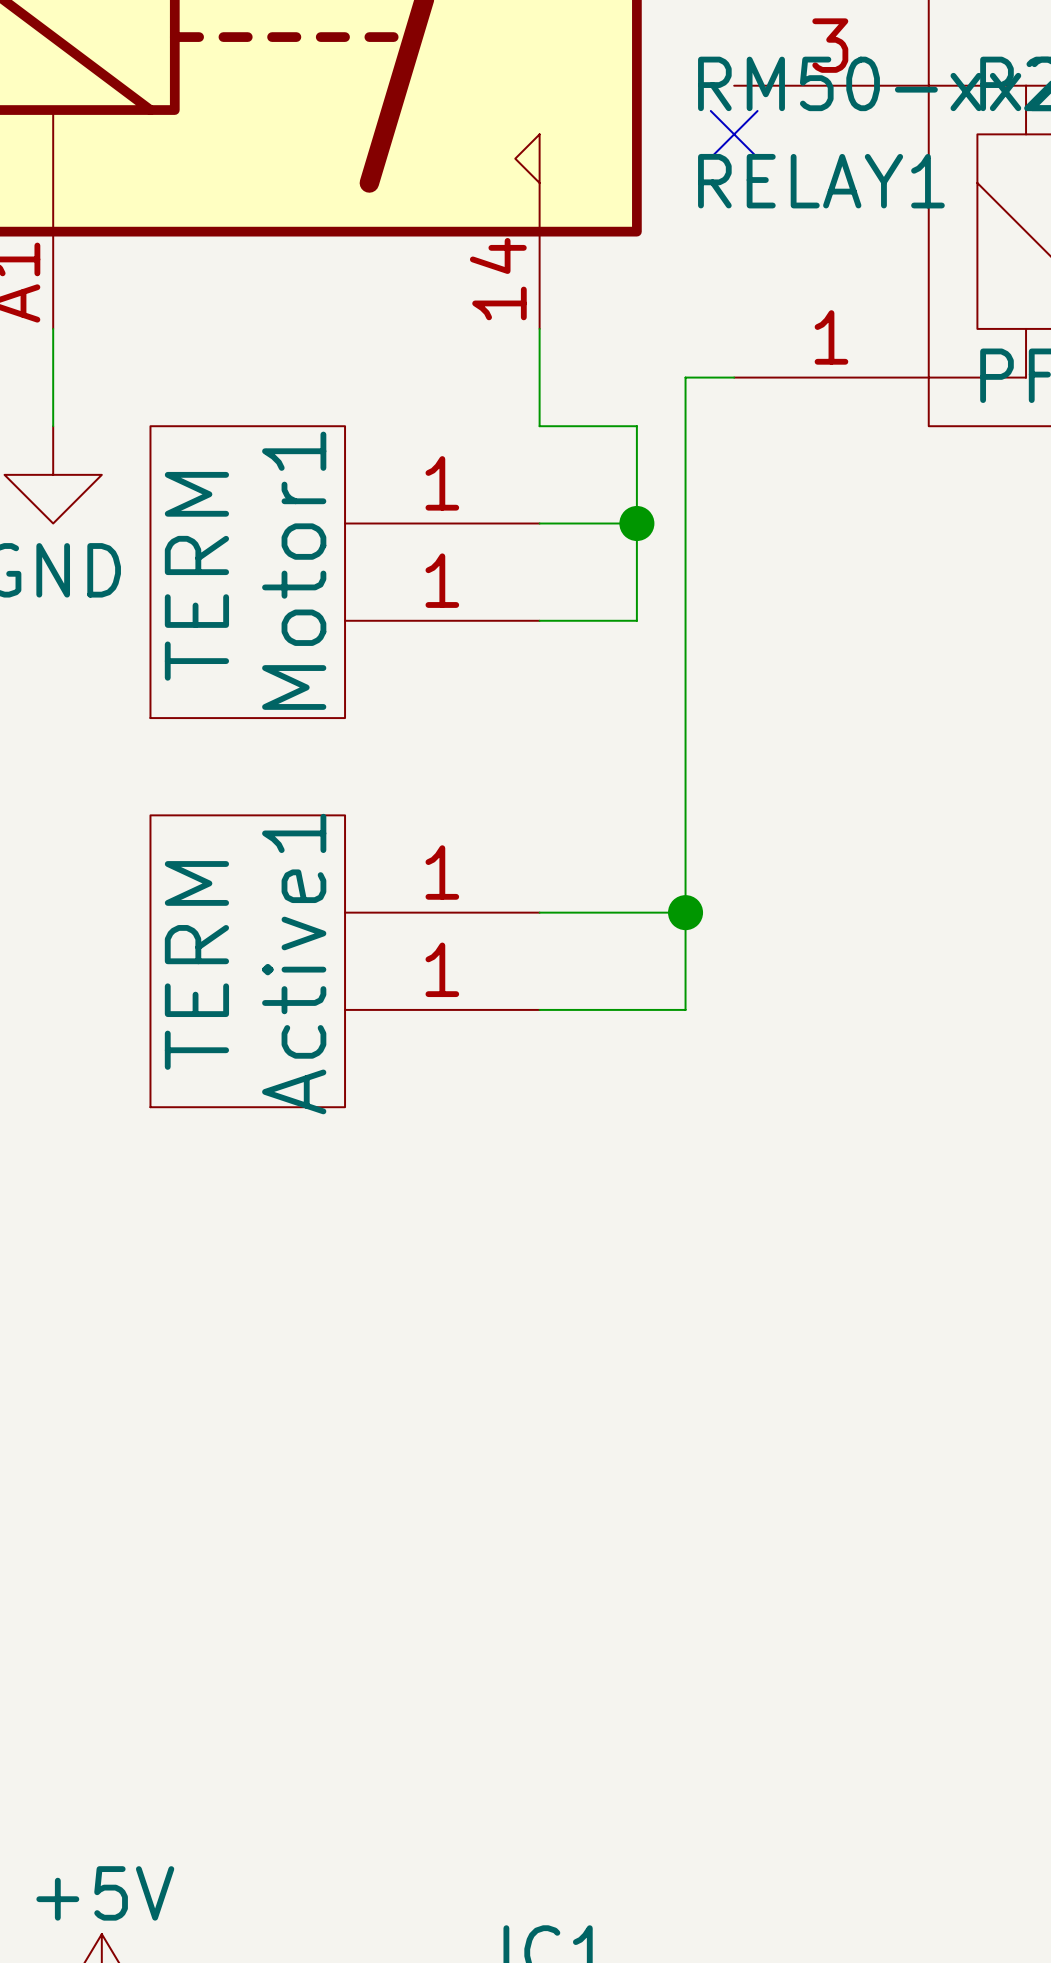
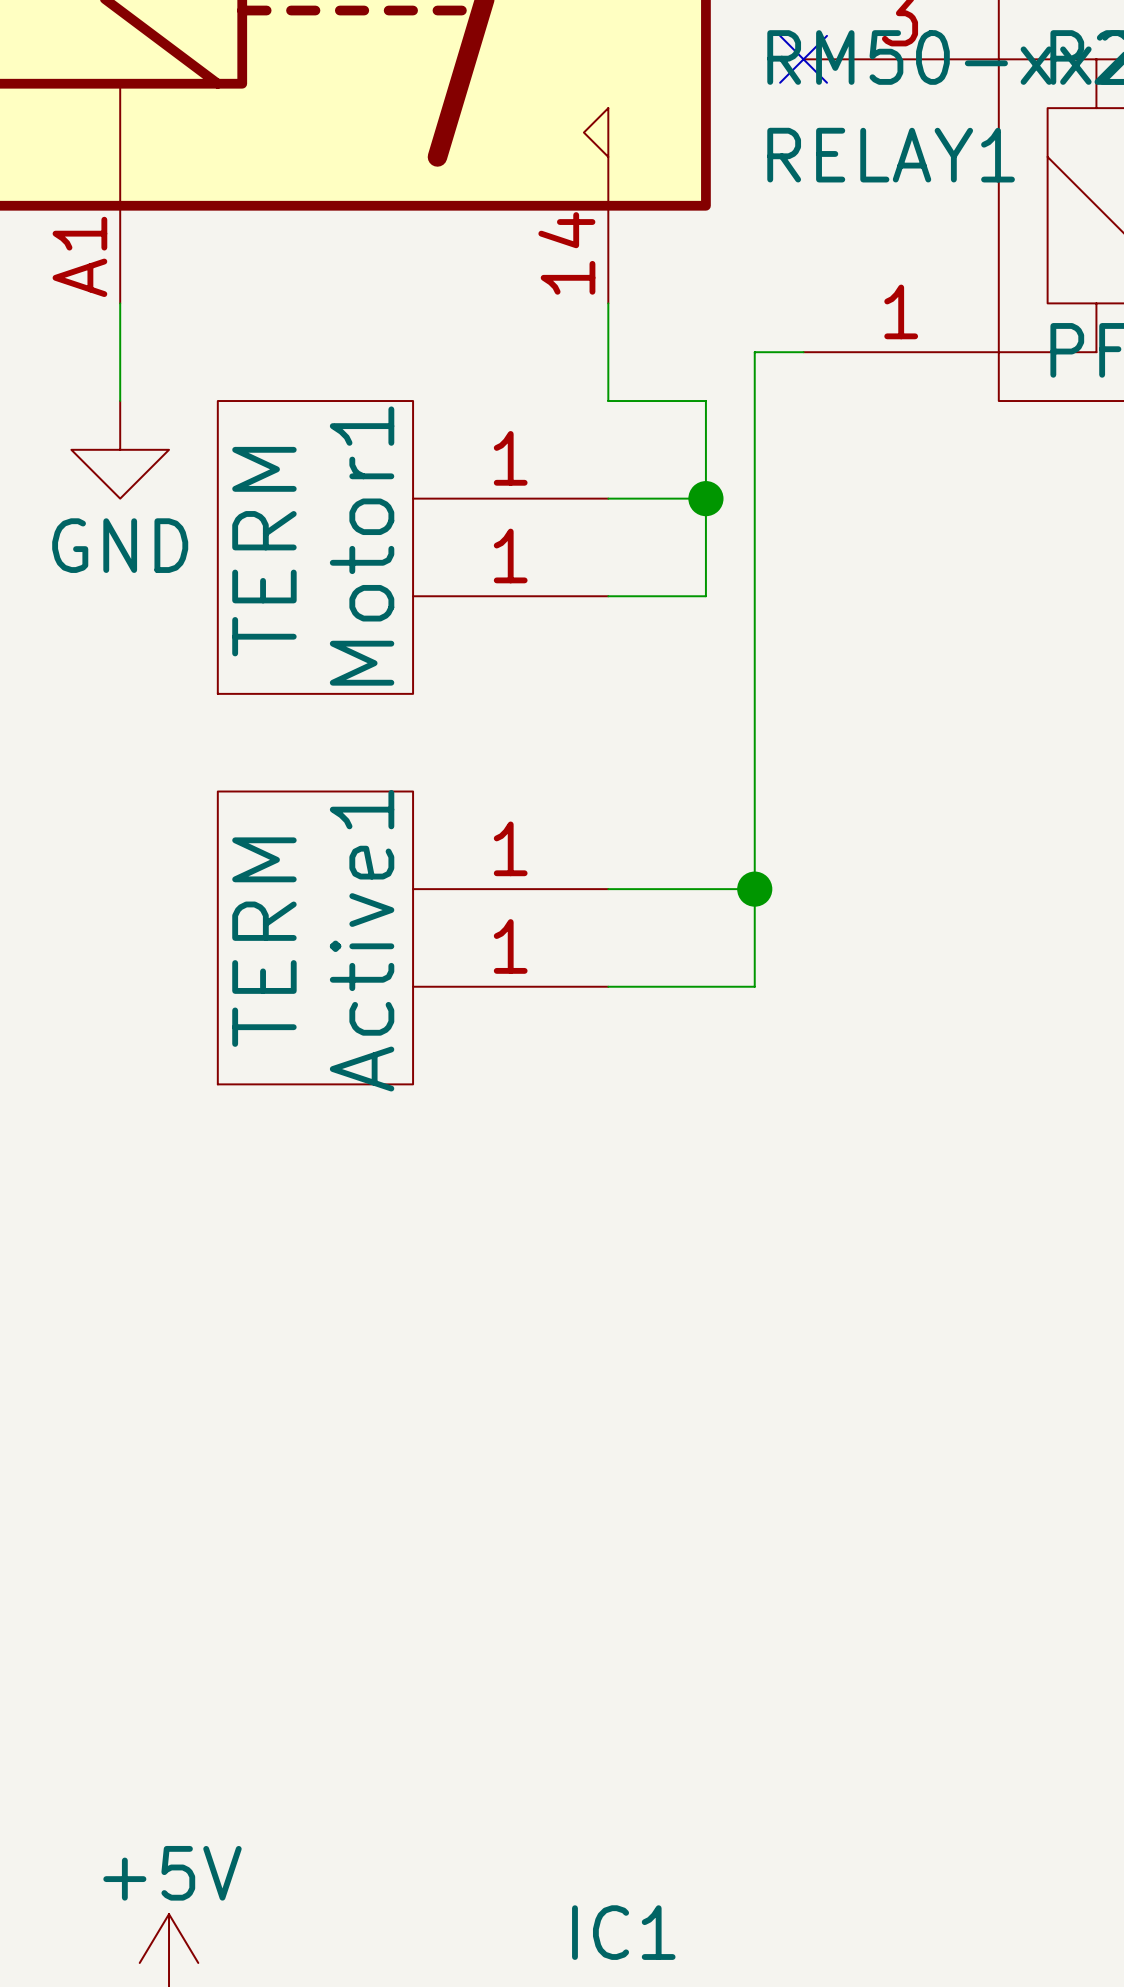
no-connect mark position: (734, 134) -> (803, 59)

